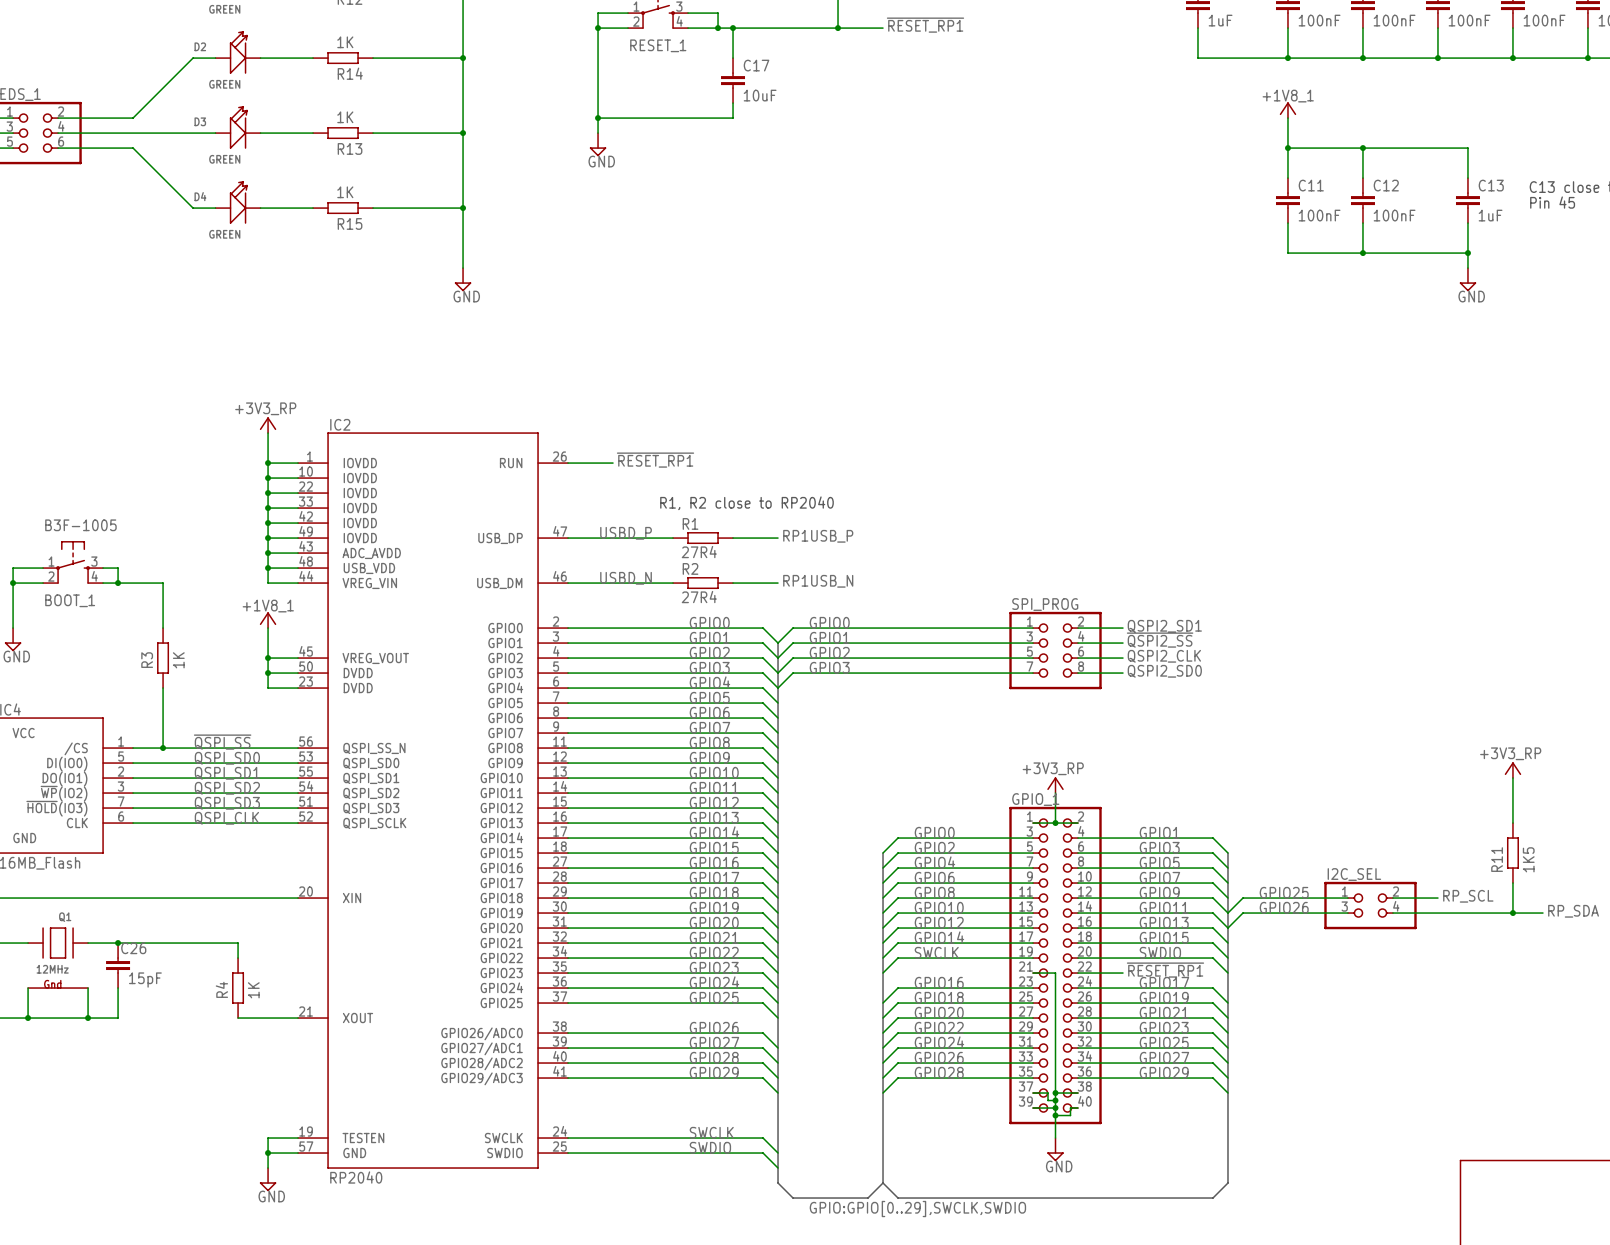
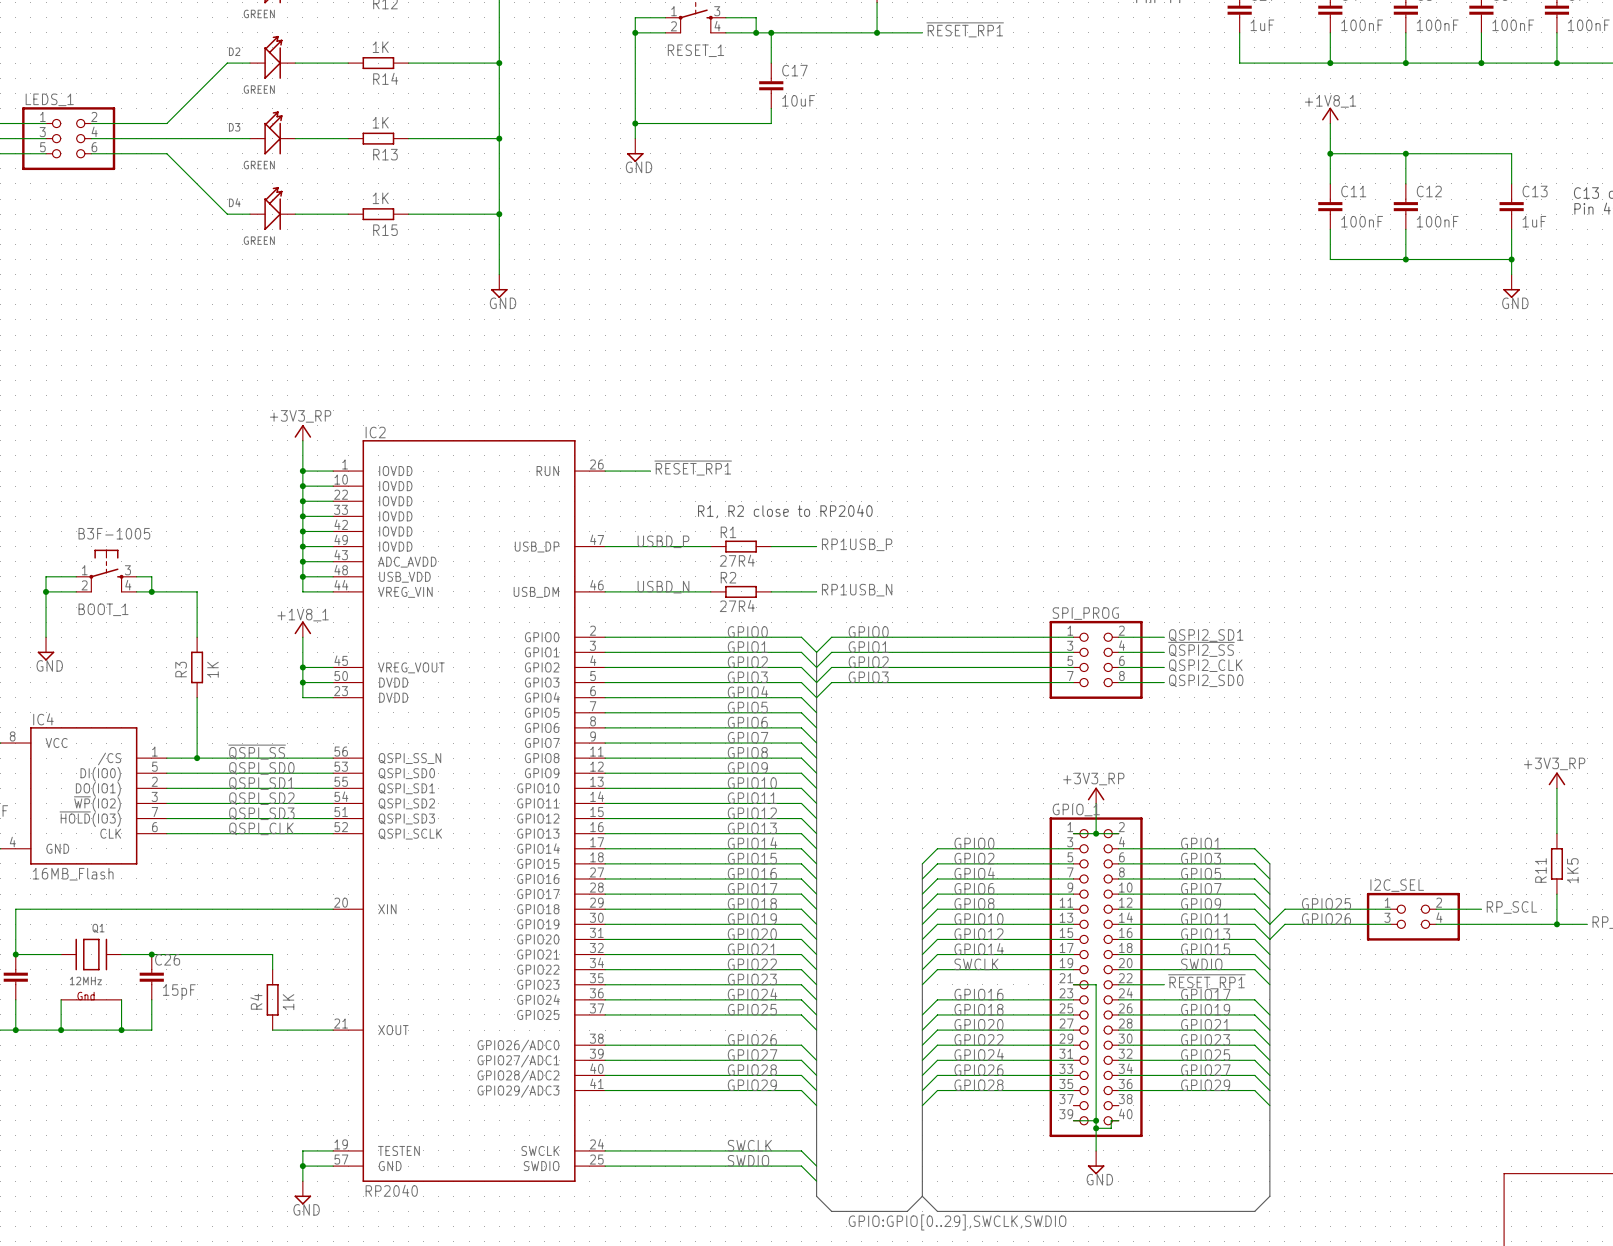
wire: (1033, 1093) (1048, 1093) (1048, 1100) (1055, 1100) -> none
wire: (1055, 1093) (1078, 1093) -> none
junction: (1055, 1093) -> none
junction: (1055, 1100) -> none

